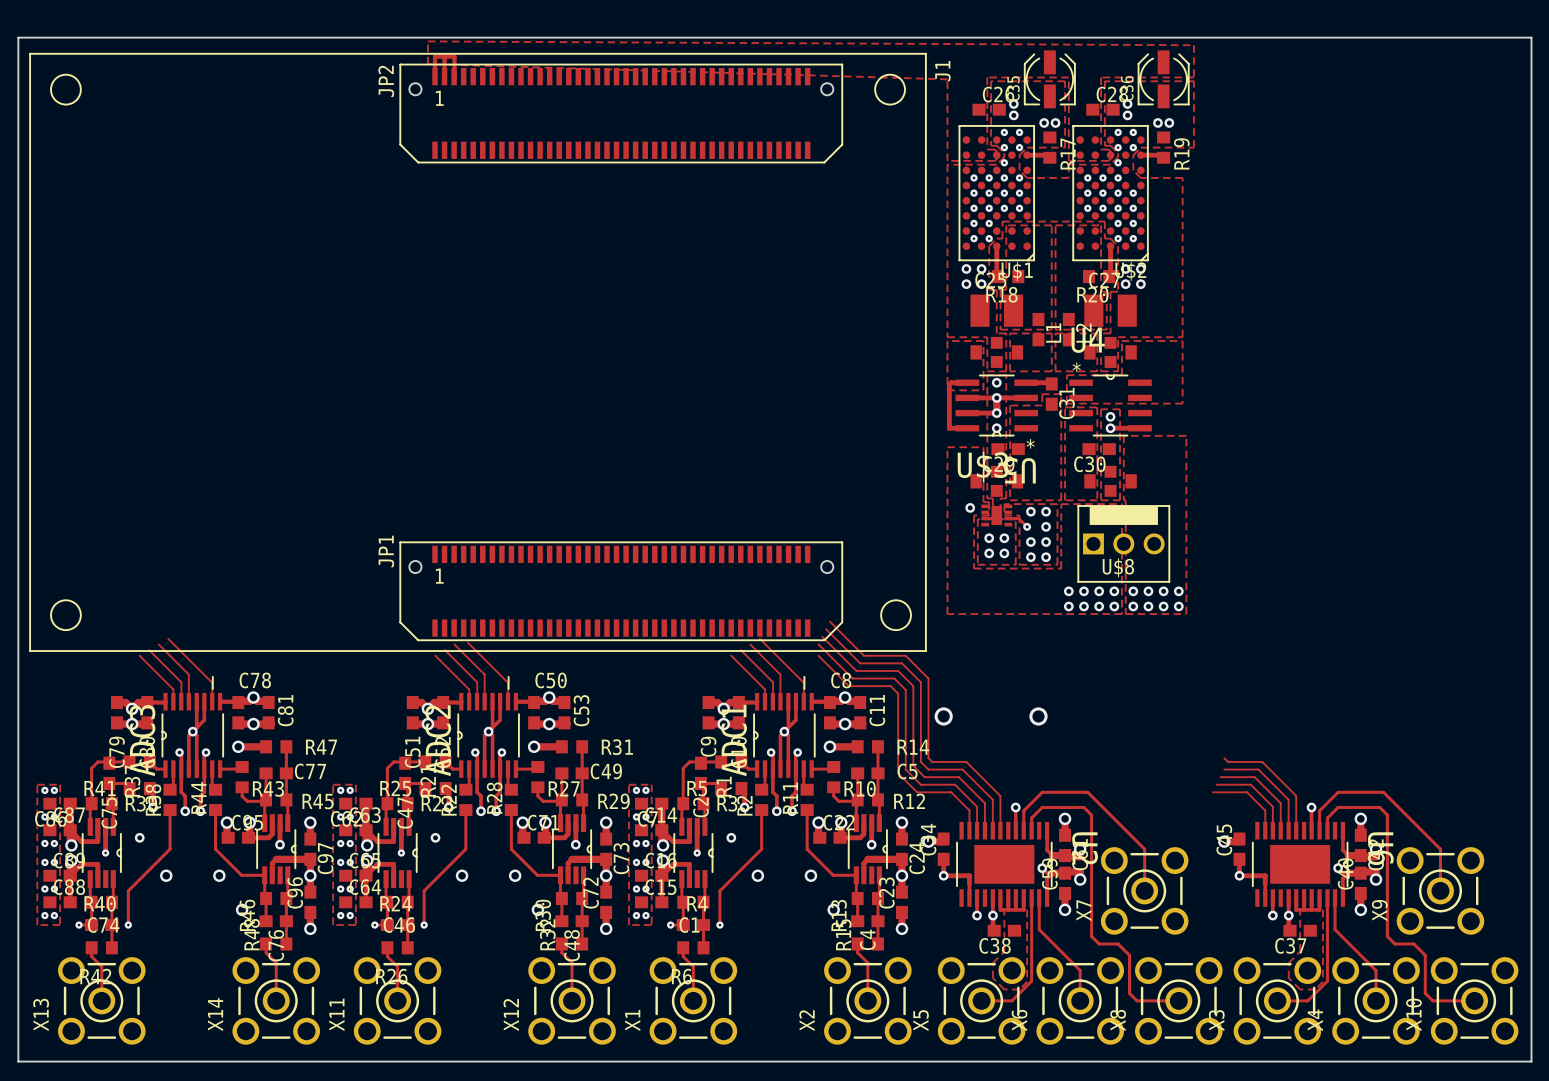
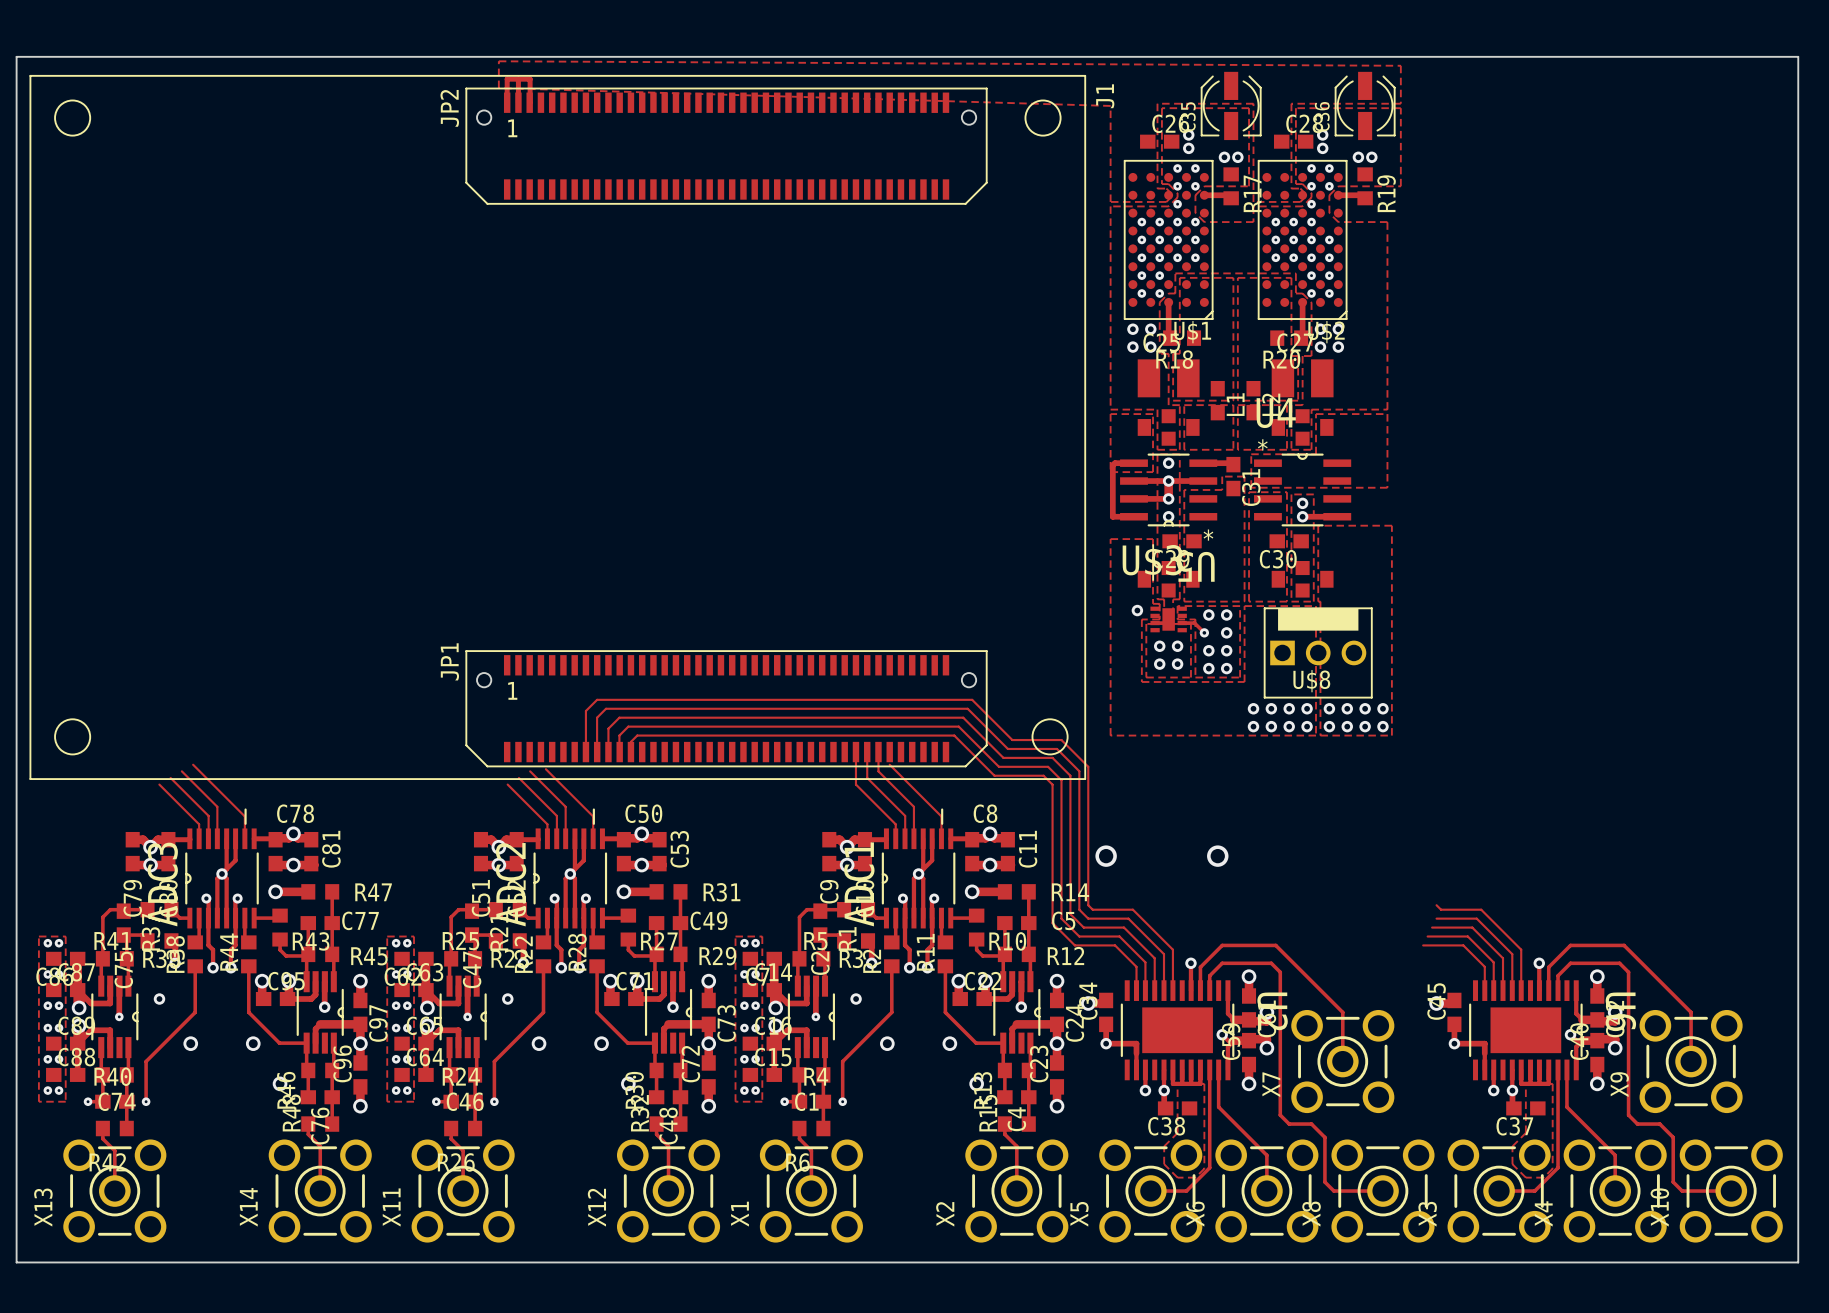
track: (829, 621) (864, 655) (905, 655) (928, 678) -> (585, 752) (585, 710) (597, 699) (972, 699) (1012, 740) (1061, 740) (1088, 766) (1088, 811)
track: none -> (855, 752) (855, 784)
track: none -> (867, 752) (867, 777)
track: none -> (878, 752) (878, 771)
track: (826, 629) (860, 663) (901, 663) (920, 682) -> (597, 751) (597, 717) (606, 708) (967, 708) (1007, 748) (1057, 748) (1079, 771) (1079, 815)
track: (822, 636) (856, 670) (898, 670) (913, 686) -> (608, 752) (608, 728) (619, 717) (963, 717) (1003, 757) (1052, 757) (1070, 775) (1070, 820)
track: (818, 644) (852, 678) (894, 678) (905, 689) -> (619, 752) (619, 735) (628, 726) (958, 726) (998, 766) (1048, 766) (1061, 780) (1061, 824)
track: (818, 655) (848, 686) (890, 686) (898, 693) -> (630, 752) (630, 741) (637, 735) (954, 735) (994, 775) (1043, 775) (1052, 784) (1052, 829)

